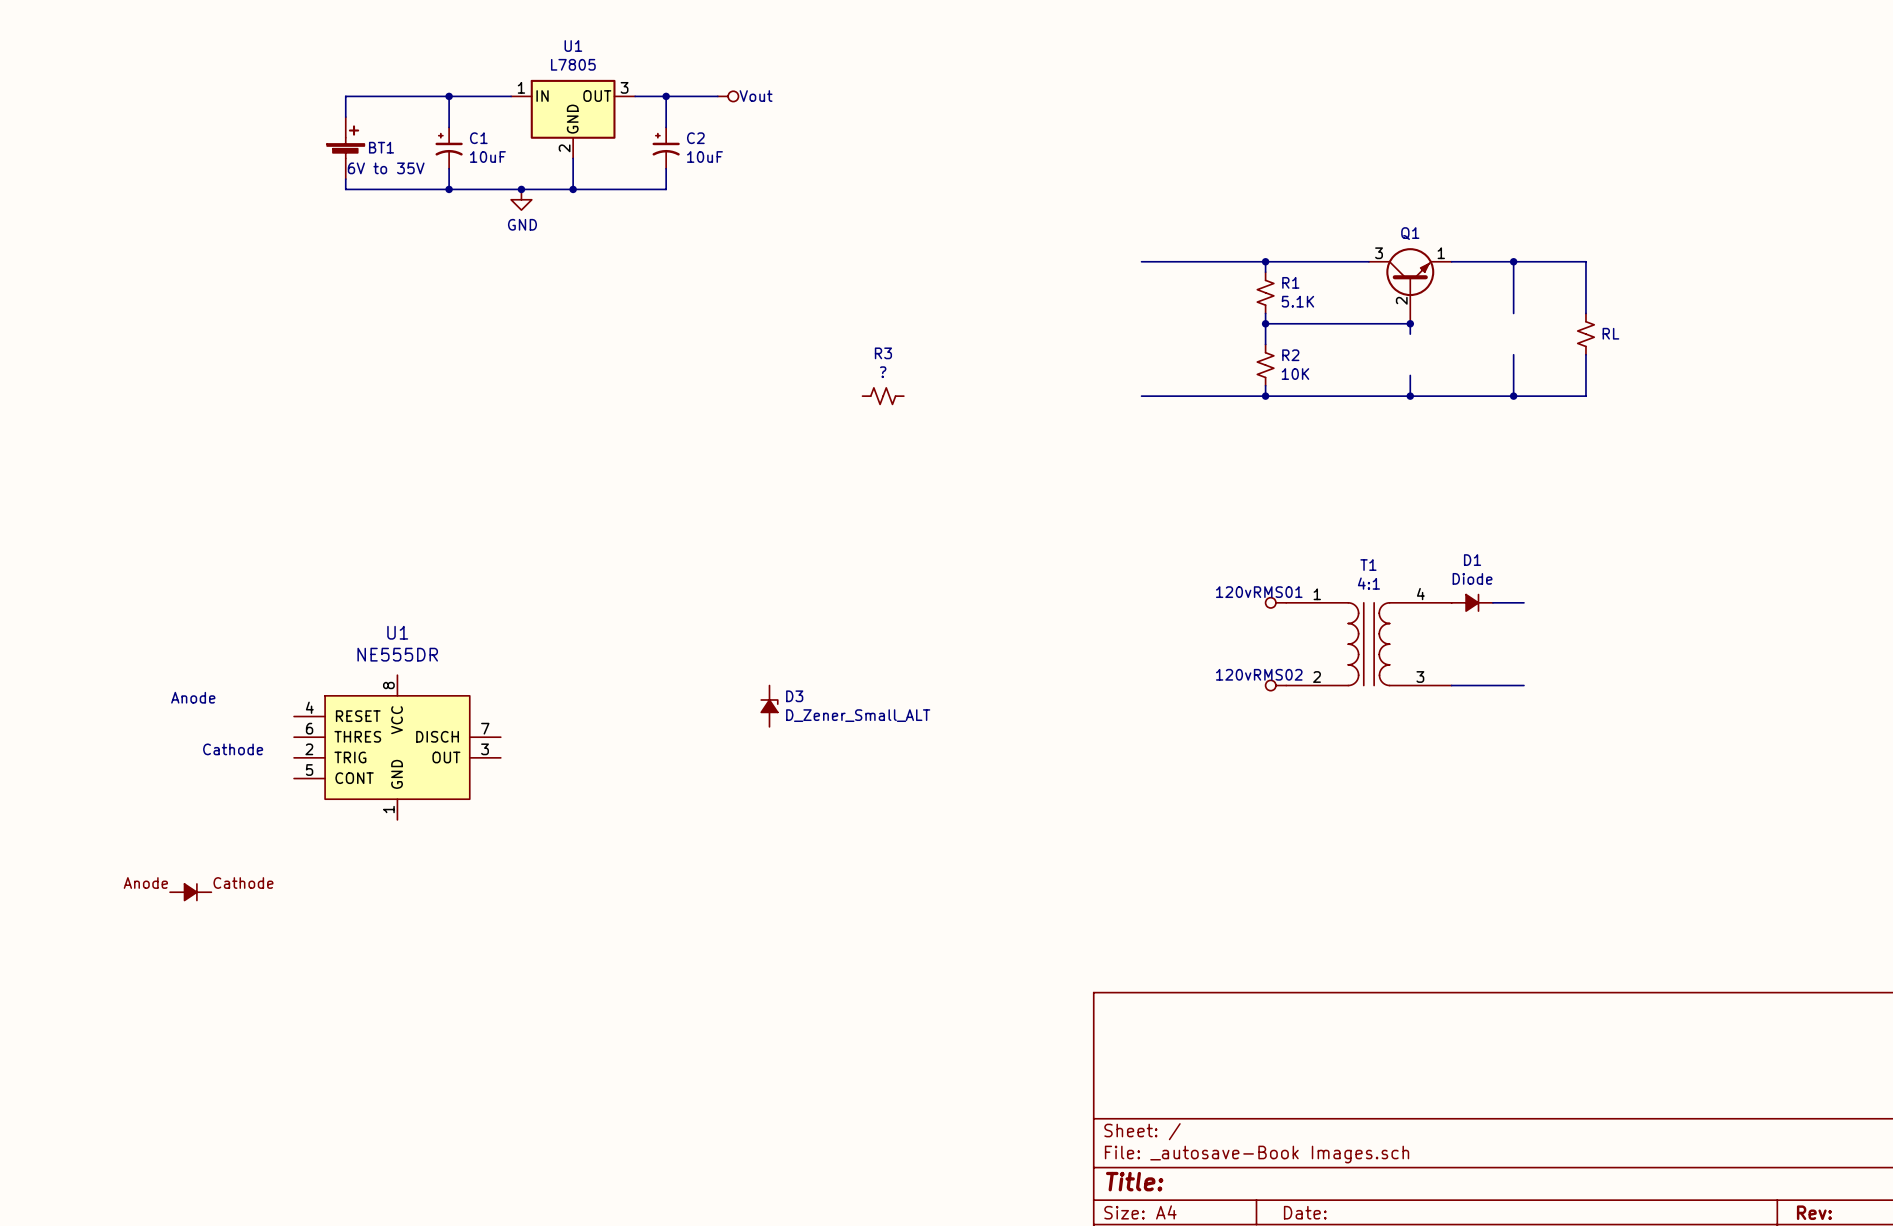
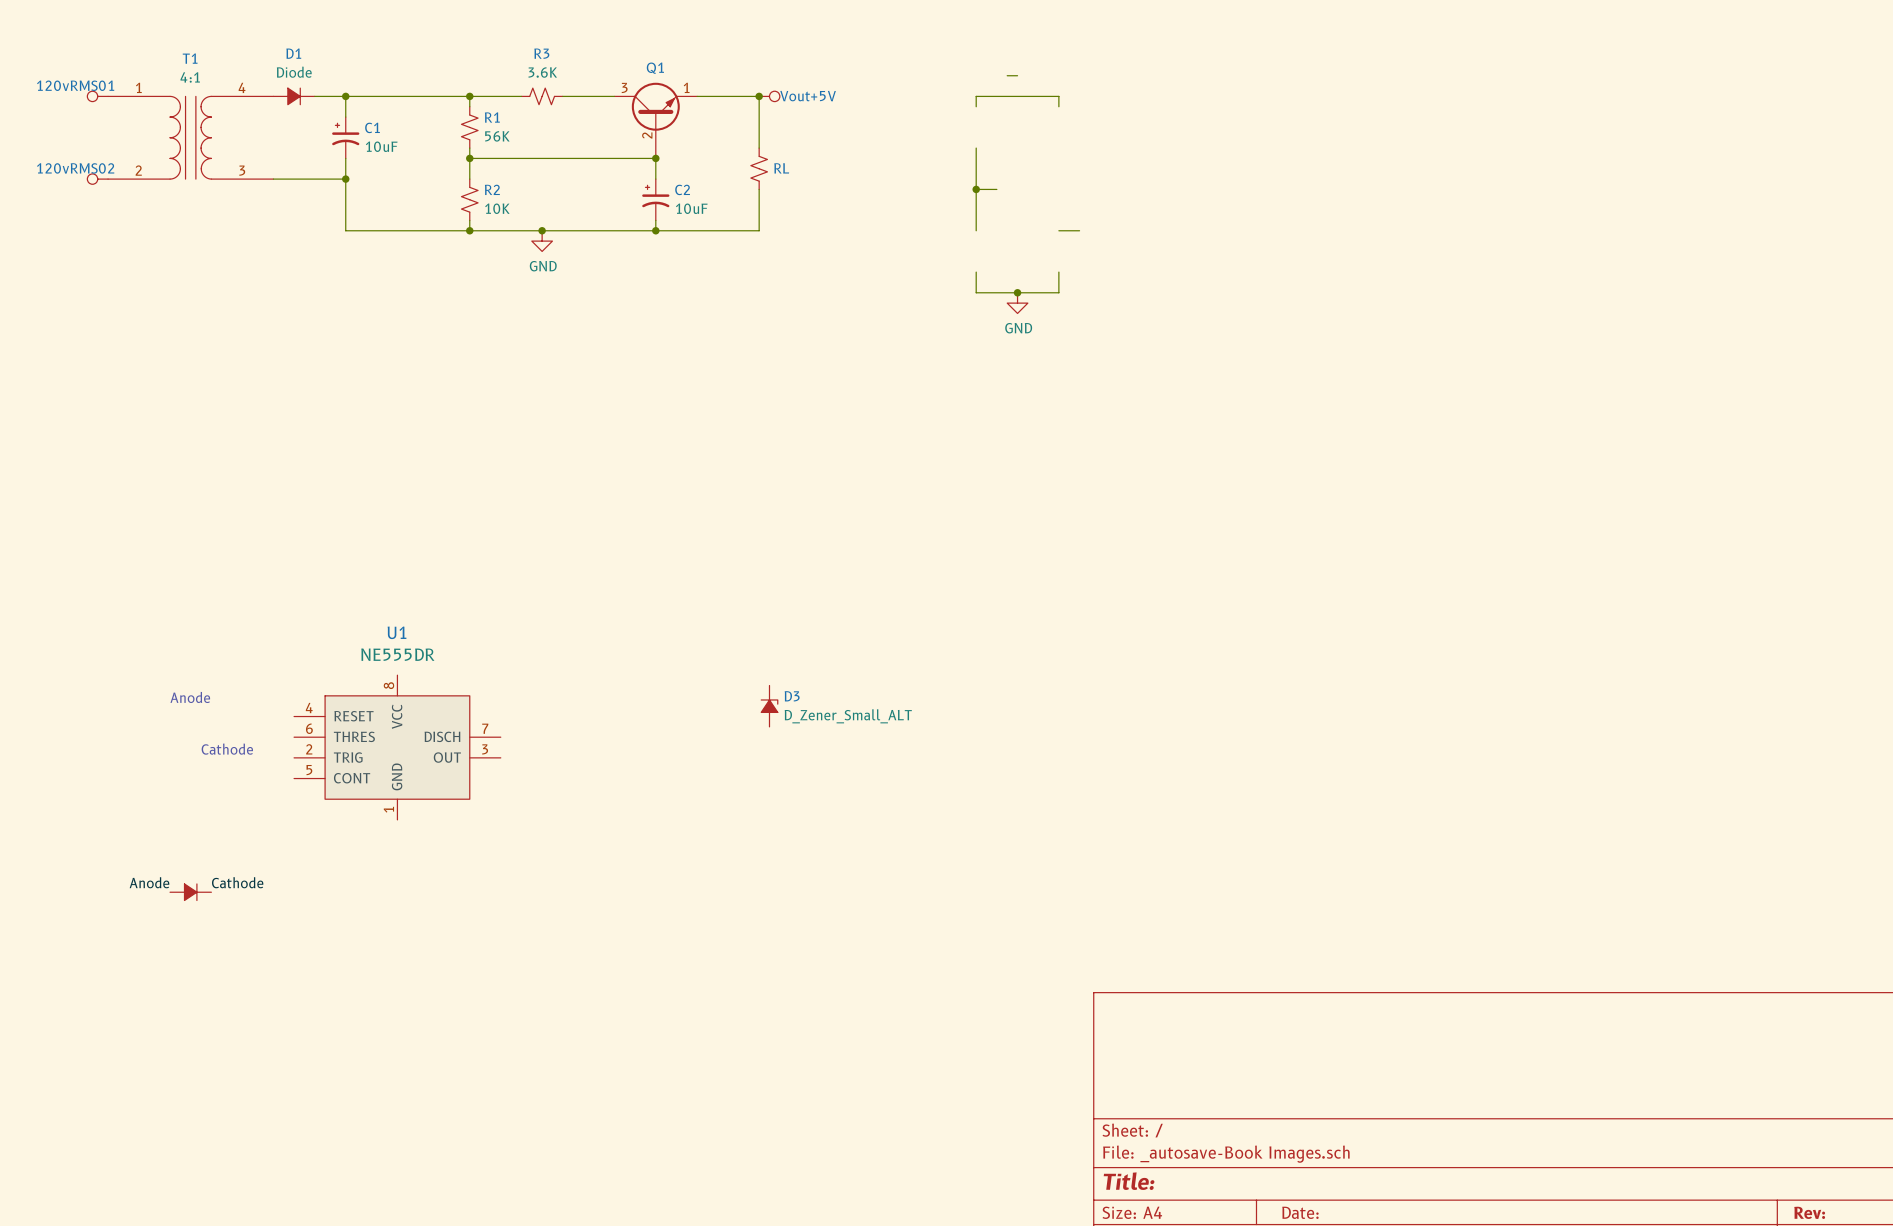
wire: none -> (1007, 75) (1017, 75)
wire: none -> (314, 96) (345, 96)
junction: none -> (345, 96)
wire: (449, 96) (449, 127) -> (469, 148) (469, 179)
junction position: (449, 96) -> (469, 96)
wire: none -> (469, 96) (469, 106)
wire: (635, 96) (697, 96) -> none
wire: (666, 96) (666, 127) -> none
junction: (666, 96) -> none
wire: none -> (717, 96) (759, 96) (759, 148)
Vout: (728, 96) -> none
junction: none -> (759, 96)
Vout+5V: none -> (769, 96)
wire: none -> (976, 106) (976, 96) (1058, 96) (1058, 106)
U1: L7805 (573, 119) -> none
BT1: 6V to 35V (345, 148) -> none
C1 position: (449, 148) -> (345, 137)
C2 position: (666, 148) -> (655, 199)
wire: none -> (976, 148) (976, 230)
wire: none -> (345, 158) (345, 179) (273, 179)
wire: none -> (469, 158) (655, 158) (655, 179)
junction: none -> (469, 158)
wire: (573, 158) (573, 189) -> none
junction: none -> (655, 158)
wire: (449, 168) (449, 189) -> none
wire: (666, 168) (666, 189) (345, 189) -> (759, 189) (759, 230) (345, 230) (345, 189)
RL: none -> (759, 168)
junction: none -> (345, 179)
junction: (449, 189) -> none
junction: (521, 189) -> none
junction: (573, 189) -> none
wire: none -> (976, 189) (996, 189)
junction: none -> (976, 189)
power symbol position: GND (521, 199) -> GND (542, 241)
wire: none -> (469, 220) (469, 230)
wire: none -> (655, 220) (655, 230)
junction: none -> (469, 230)
junction: none -> (542, 230)
junction: none -> (655, 230)
wire: none -> (1058, 230) (1079, 230)
wire: (1141, 261) (1368, 261) -> none
wire: (1265, 261) (1265, 272) -> none
junction: (1265, 261) -> none
wire: (1451, 261) (1585, 261) (1585, 313) -> none
wire: (1513, 261) (1513, 313) -> none
junction: (1513, 261) -> none
wire: none -> (976, 272) (976, 292) (1058, 292) (1058, 272)
Q1 position: (1410, 285) -> (655, 120)
junction: none -> (1017, 292)
R1 position: (1265, 292) -> (469, 127)
R1 value: 5.1K (1297, 301) -> 56K (497, 136)
power symbol: none -> GND (1017, 303)
wire: (1265, 313) (1265, 344) -> none
wire: (1265, 323) (1410, 323) (1410, 334) -> none
junction: (1265, 323) -> none
junction: (1410, 323) -> none
RL: (1585, 334) -> none
wire: (1513, 354) (1513, 396) -> none
wire: (1585, 354) (1585, 396) (1141, 396) -> none
R2 position: (1265, 365) -> (469, 199)
R3 value: ? (883, 372) -> 3.6K (542, 72)
wire: (1410, 375) (1410, 396) -> none
wire: (1265, 385) (1265, 396) -> none
R3 position: (883, 396) -> (542, 96)
junction: (1265, 396) -> none
junction: (1410, 396) -> none
junction: (1513, 396) -> none
120vRMS01 position: (1275, 602) -> (97, 96)
D1 position: (1472, 602) -> (294, 96)
wire: (1492, 602) (1523, 602) -> none
T1 position: (1368, 644) -> (190, 137)
120vRMS02 position: (1275, 685) -> (97, 179)
wire: (1451, 685) (1523, 685) -> none

